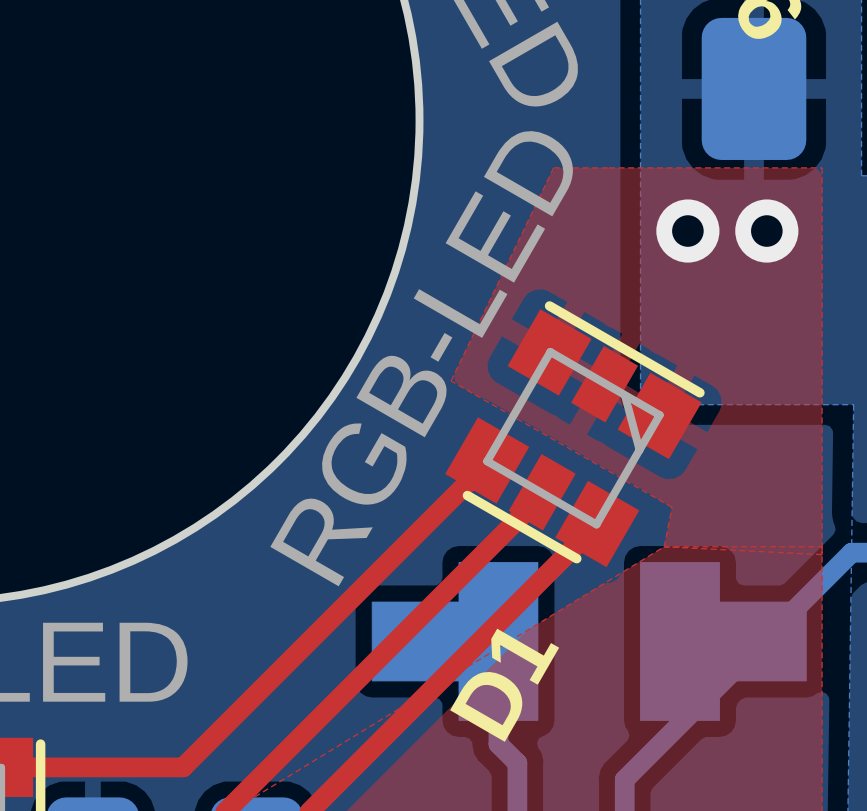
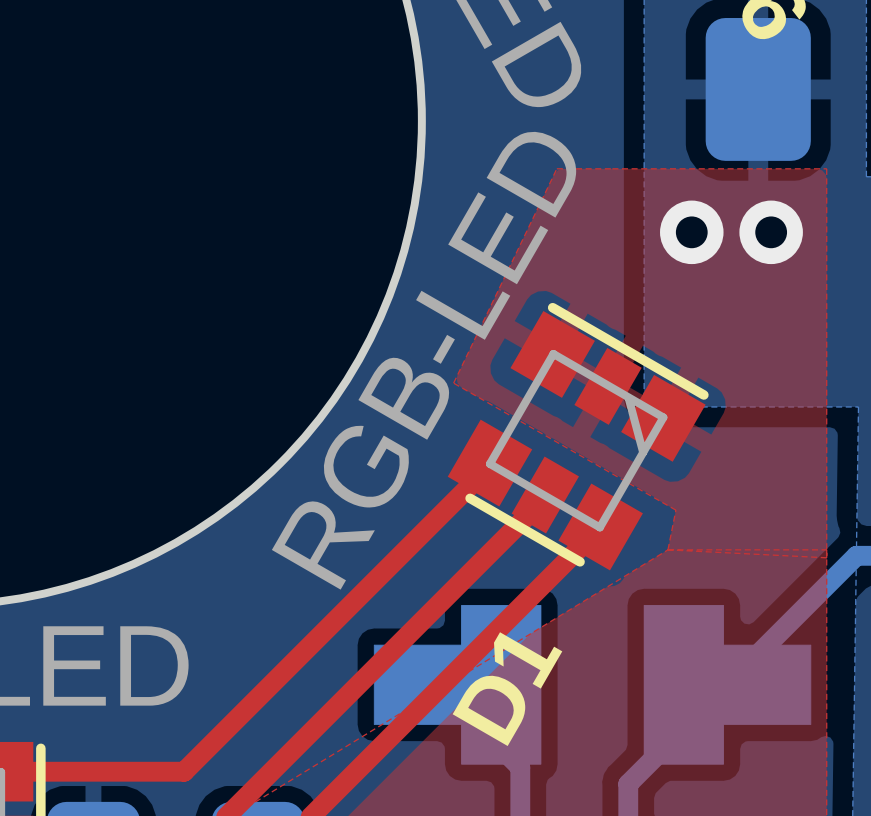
part position: (589, 641) -> (592, 684)

